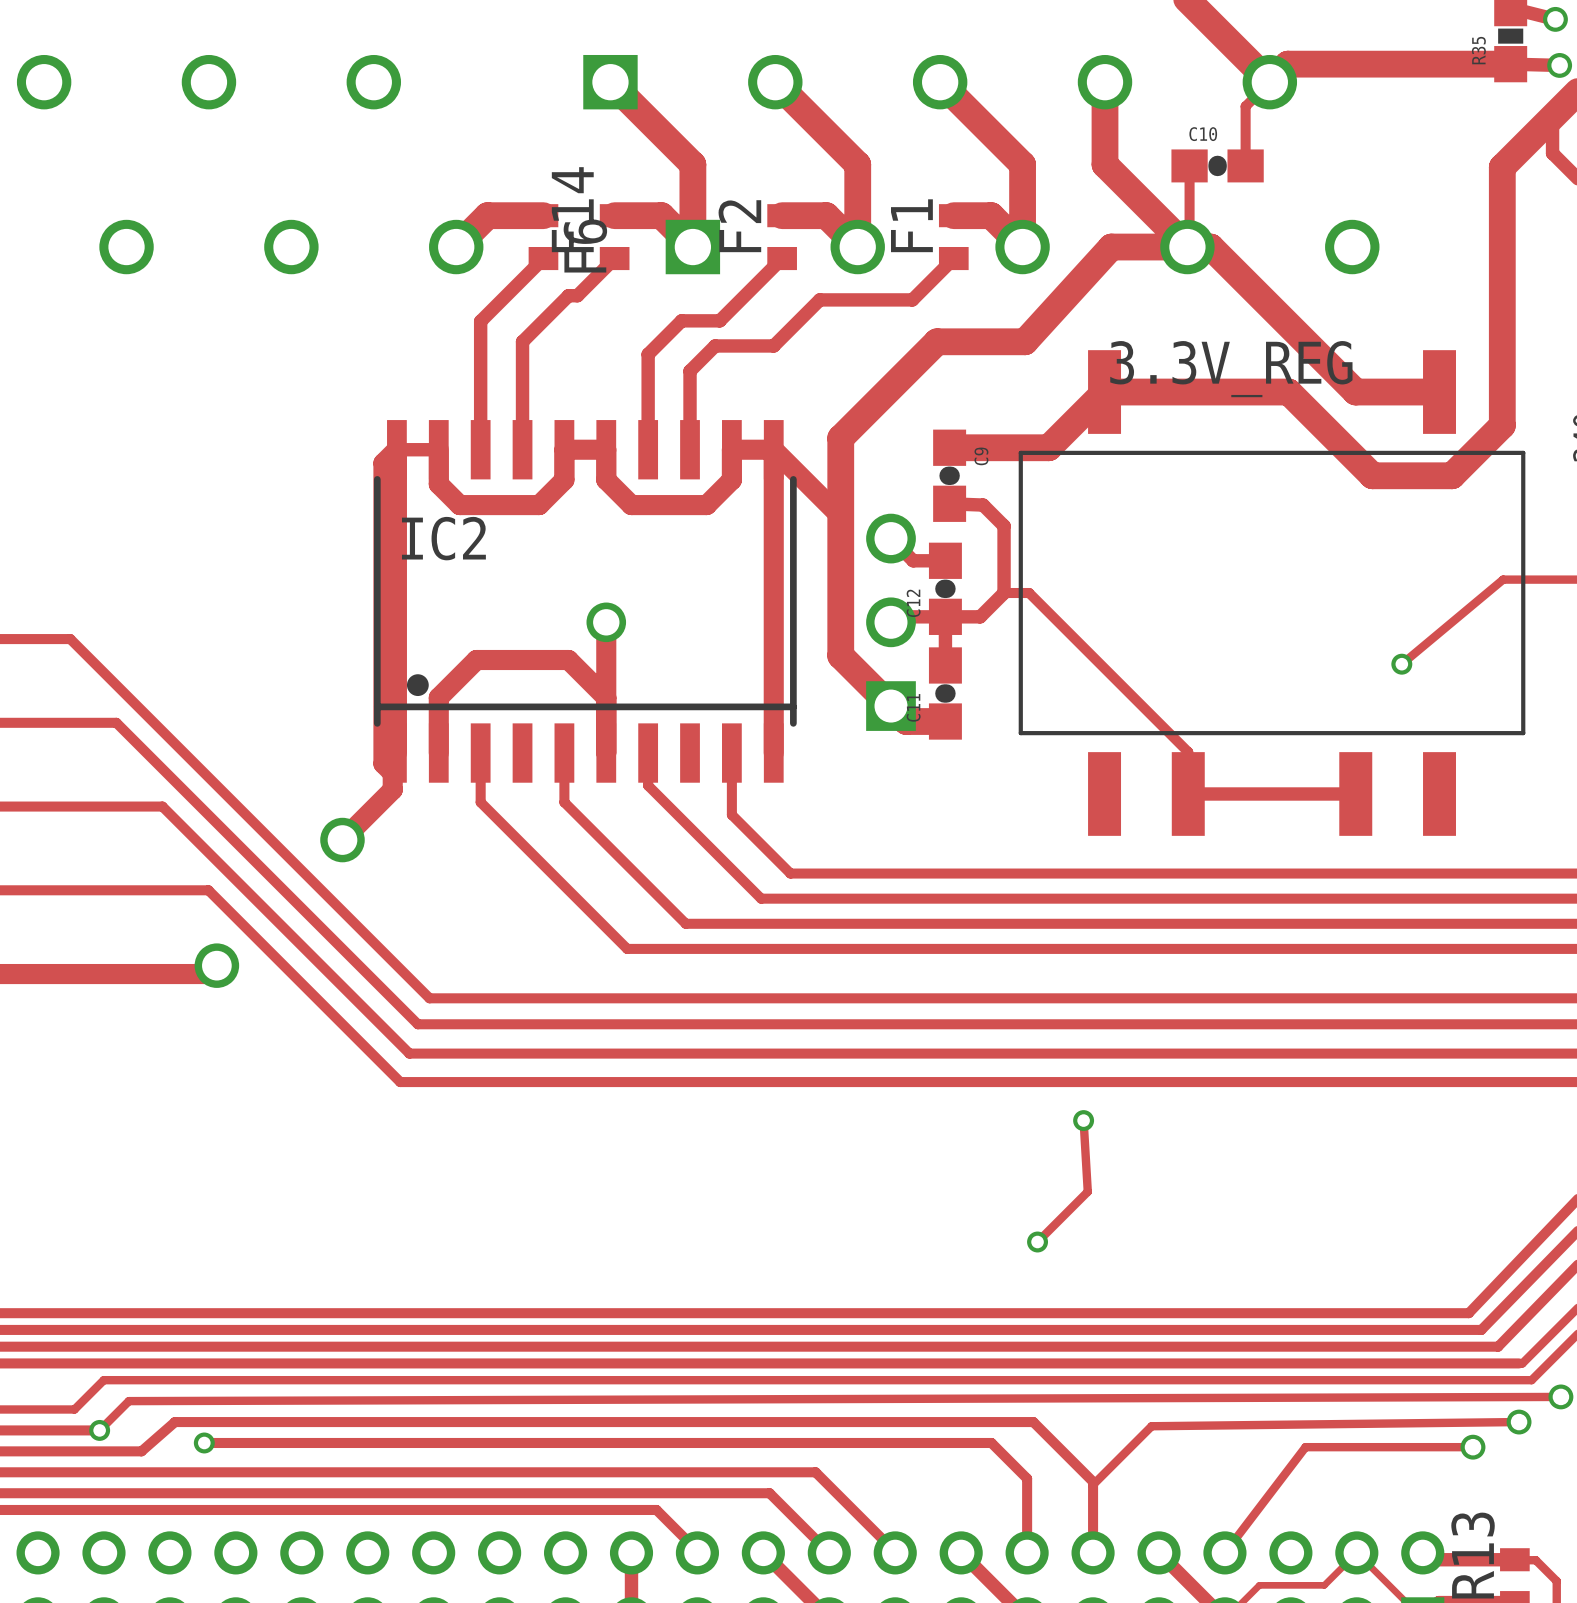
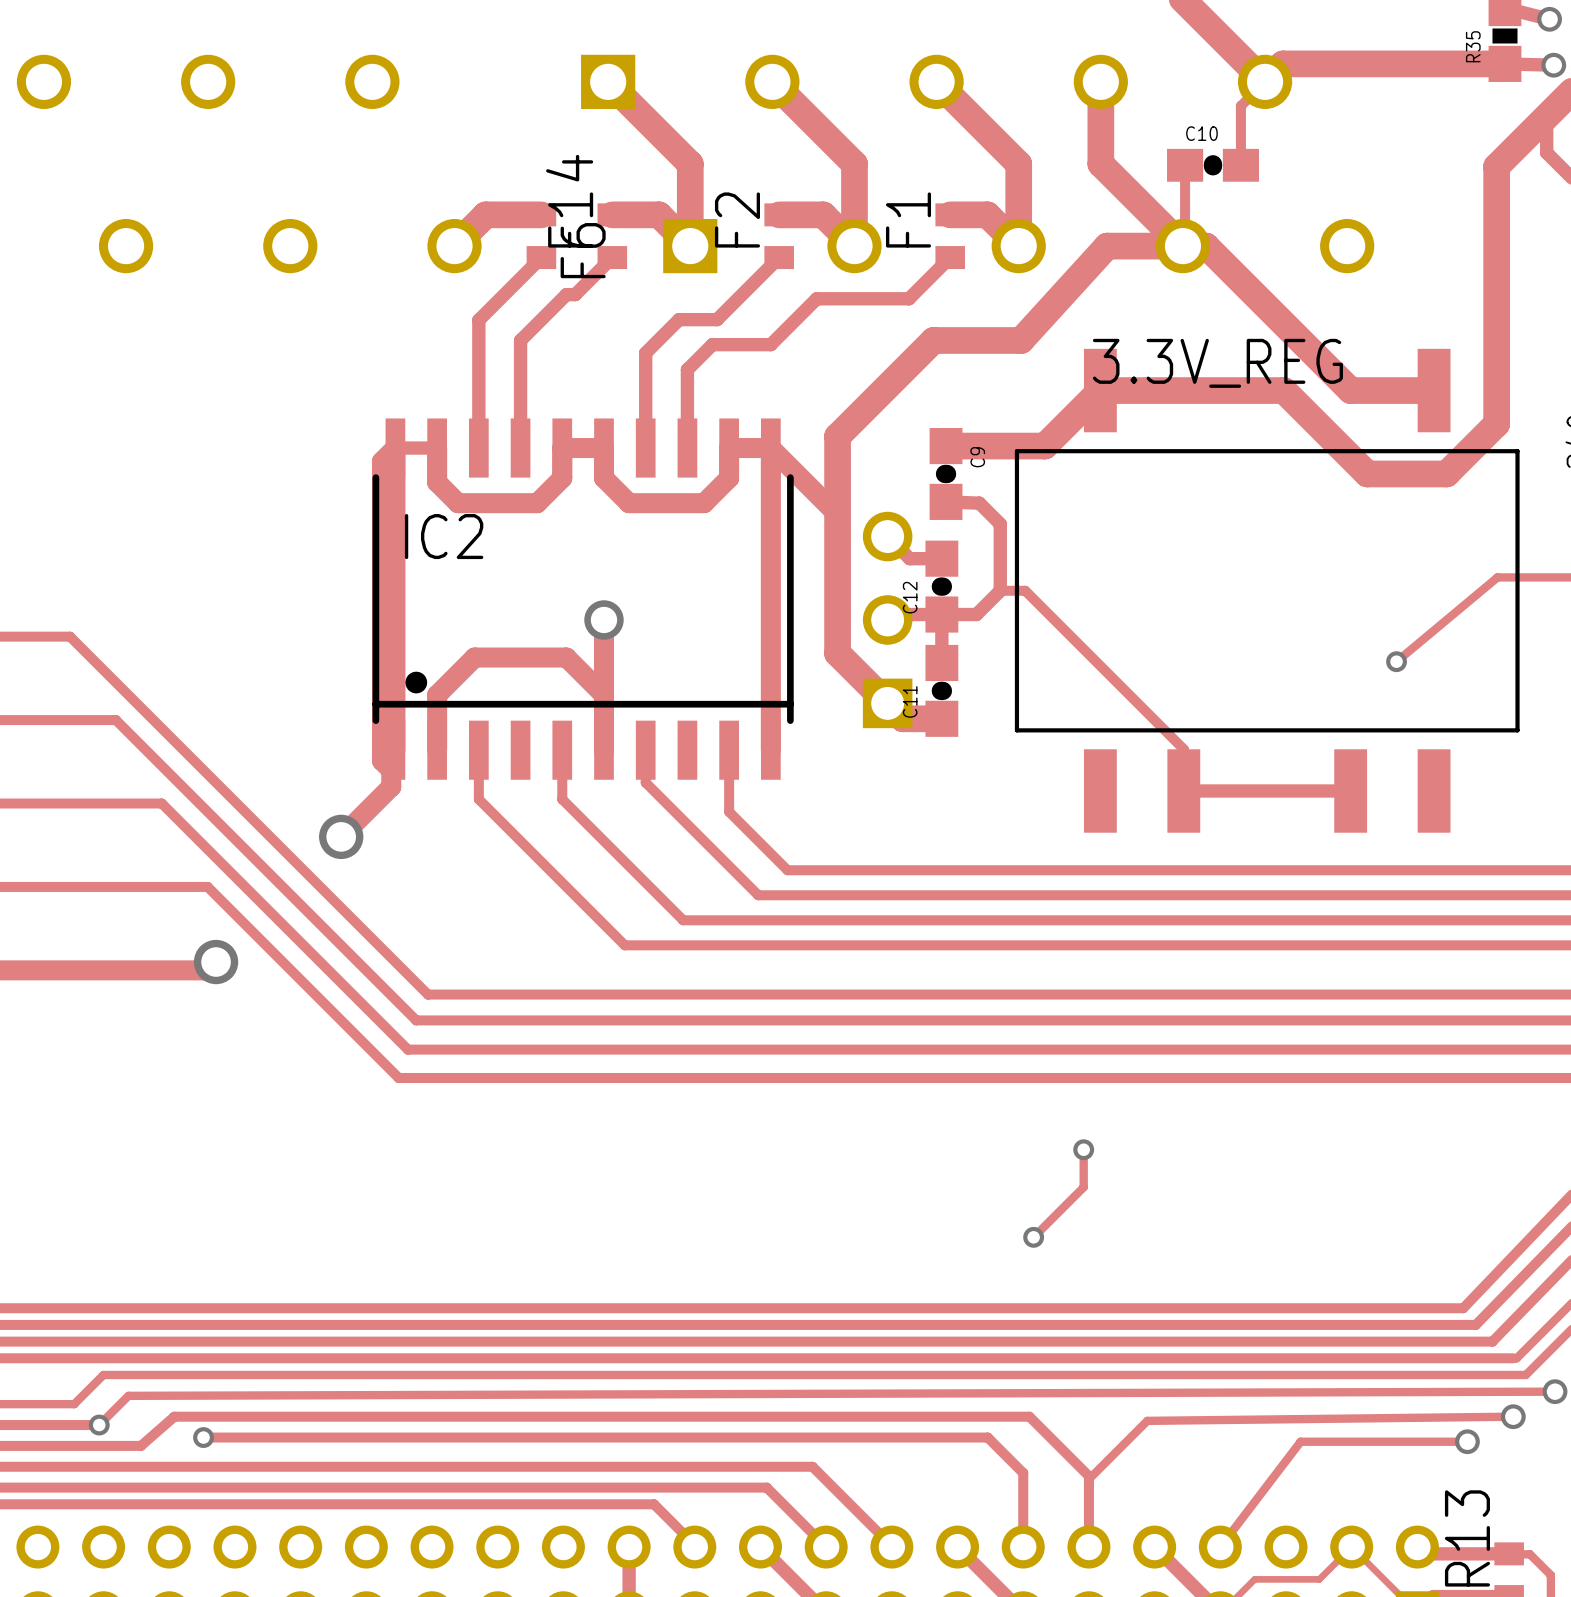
track: (1083, 1120) (1087, 1191) -> (1083, 1149) (1083, 1187)
via position: (1083, 1120) -> (1083, 1149)

